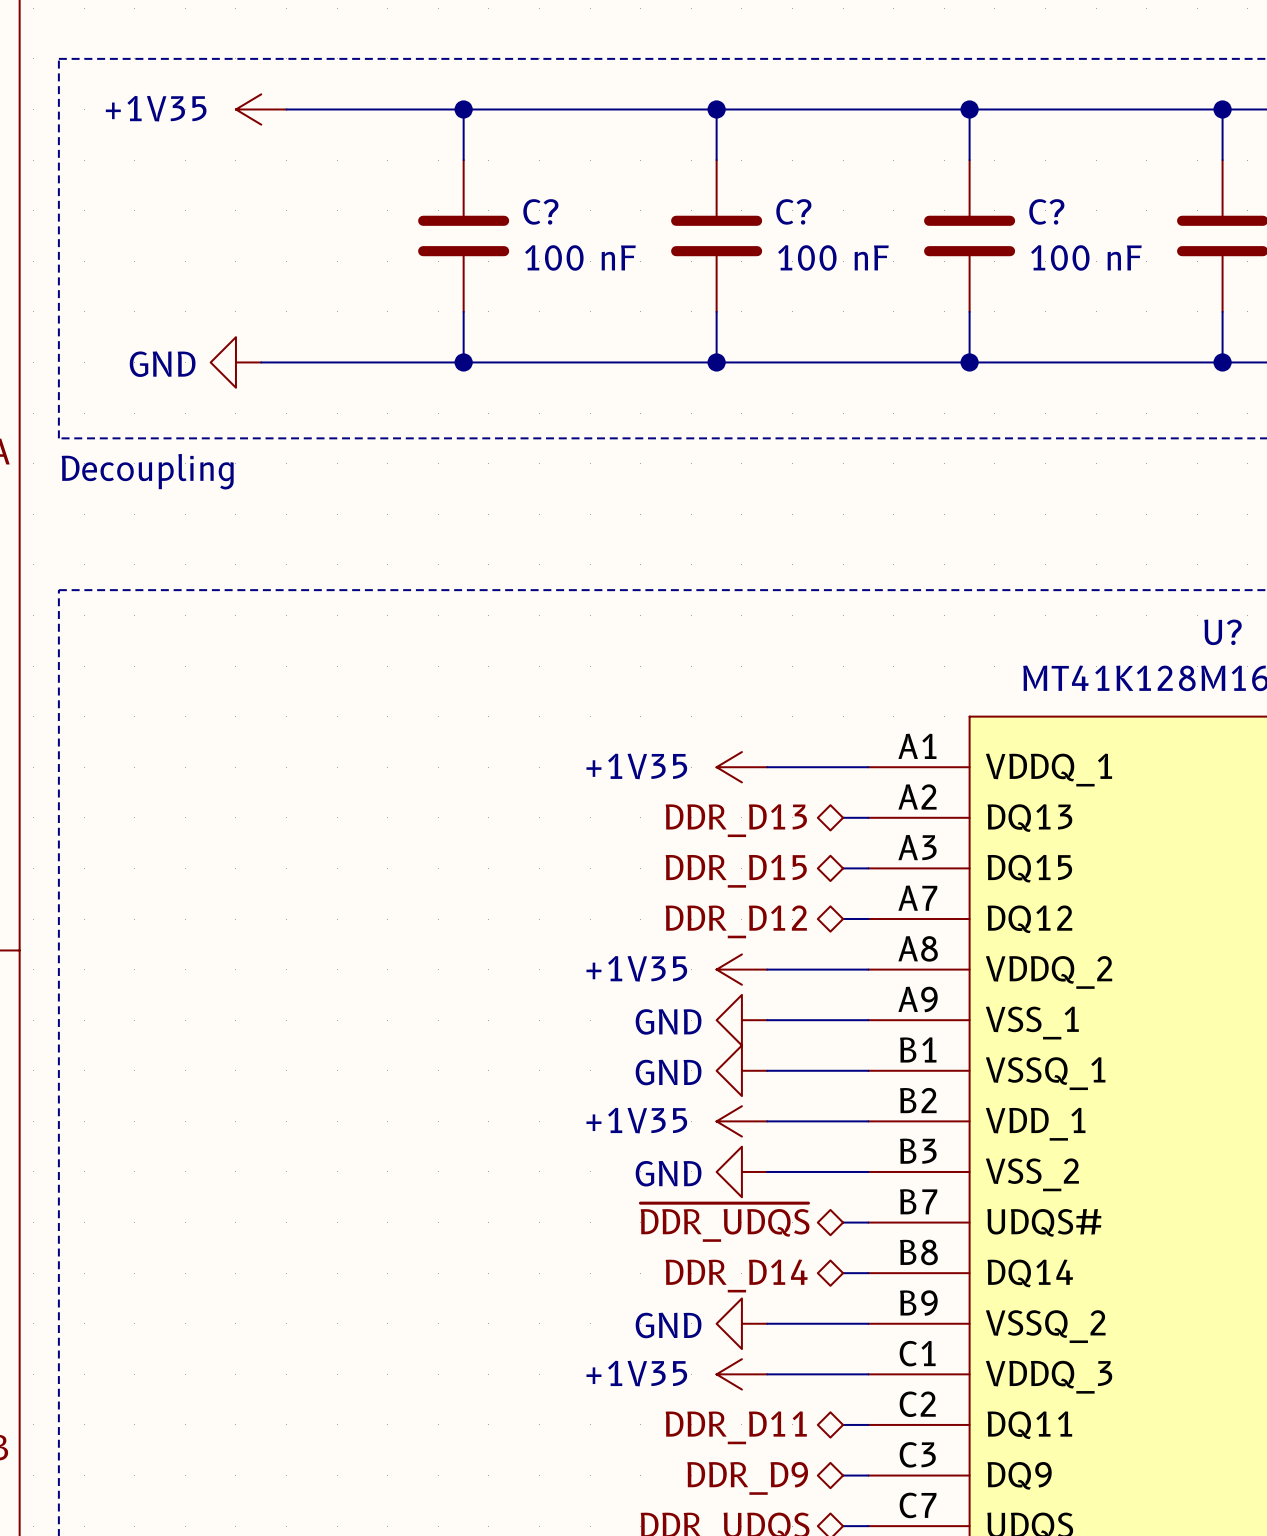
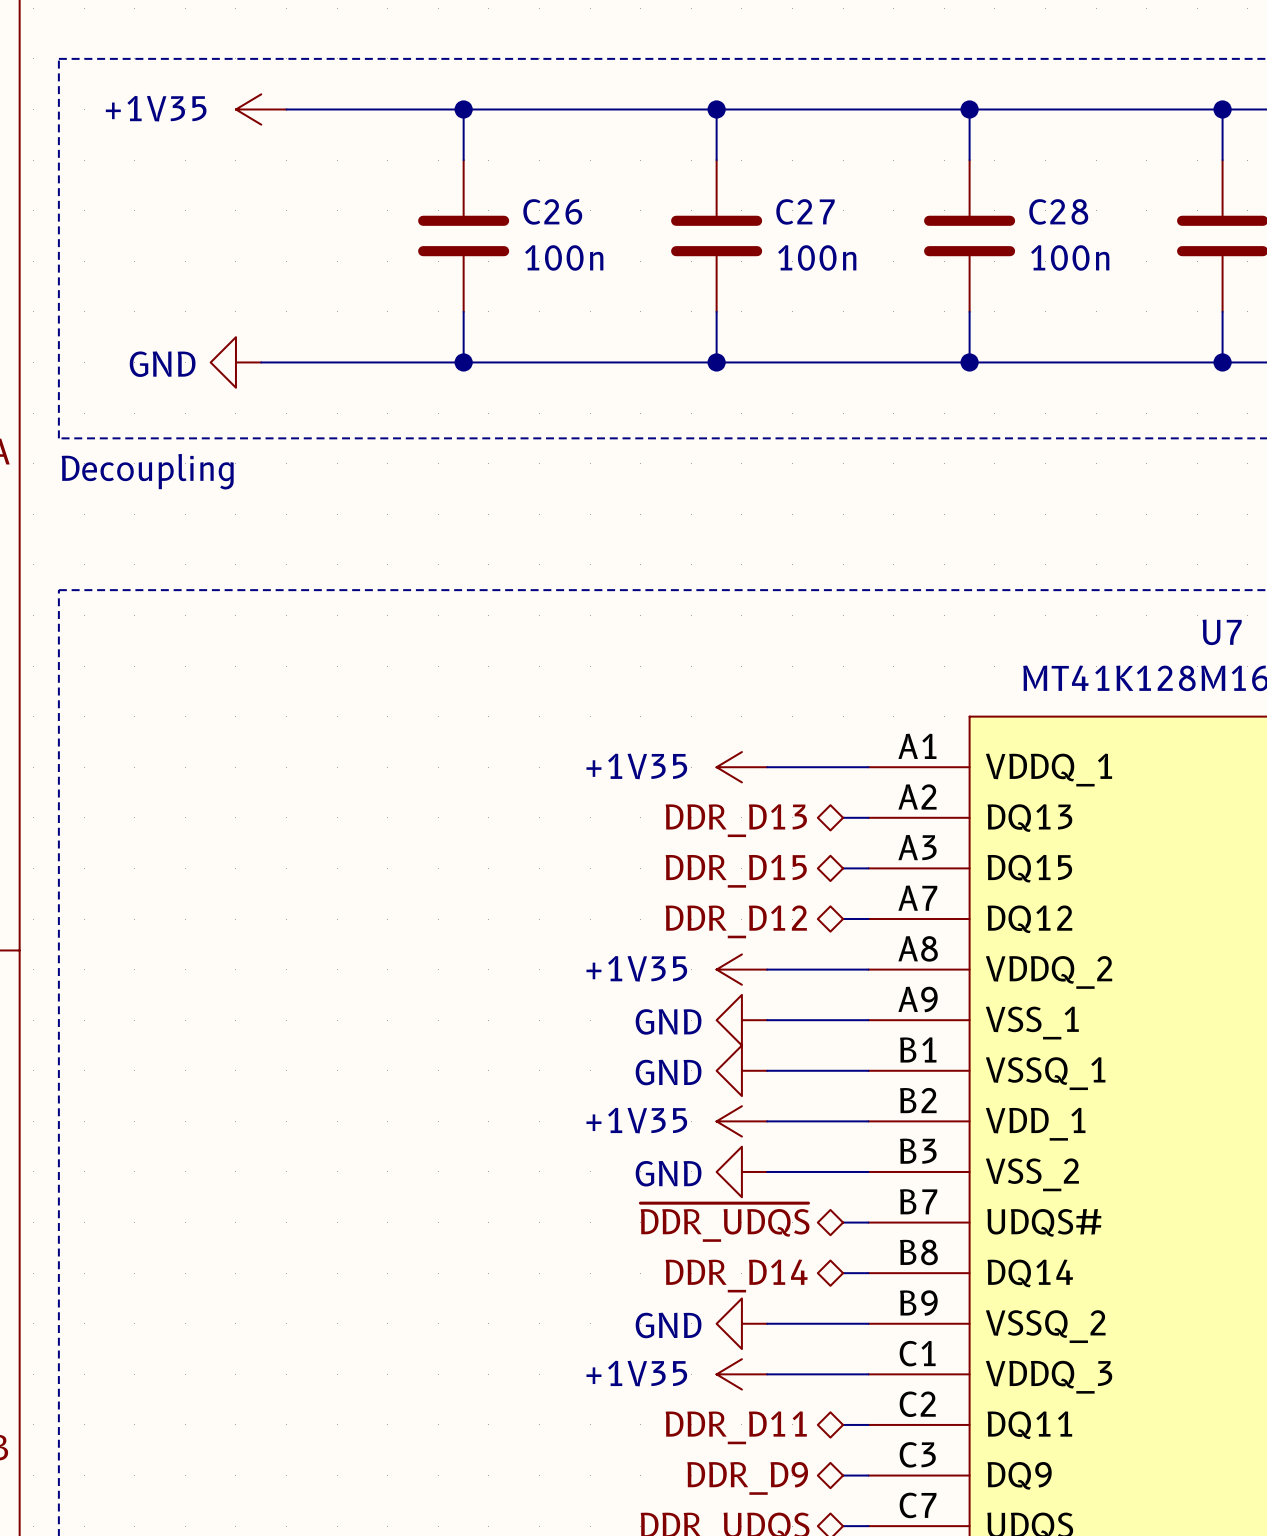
C? name: C? (540, 211) -> C26 (552, 211)
C? name: C? (793, 211) -> C27 (805, 211)
C? name: C? (1046, 211) -> C28 (1058, 211)
C? value: 100 nF (580, 257) -> 100n (564, 257)
C? value: 100 nF (833, 257) -> 100n (817, 257)
C? value: 100 nF (1086, 257) -> 100n (1070, 257)
U? name: U? (1222, 632) -> U7 (1222, 632)

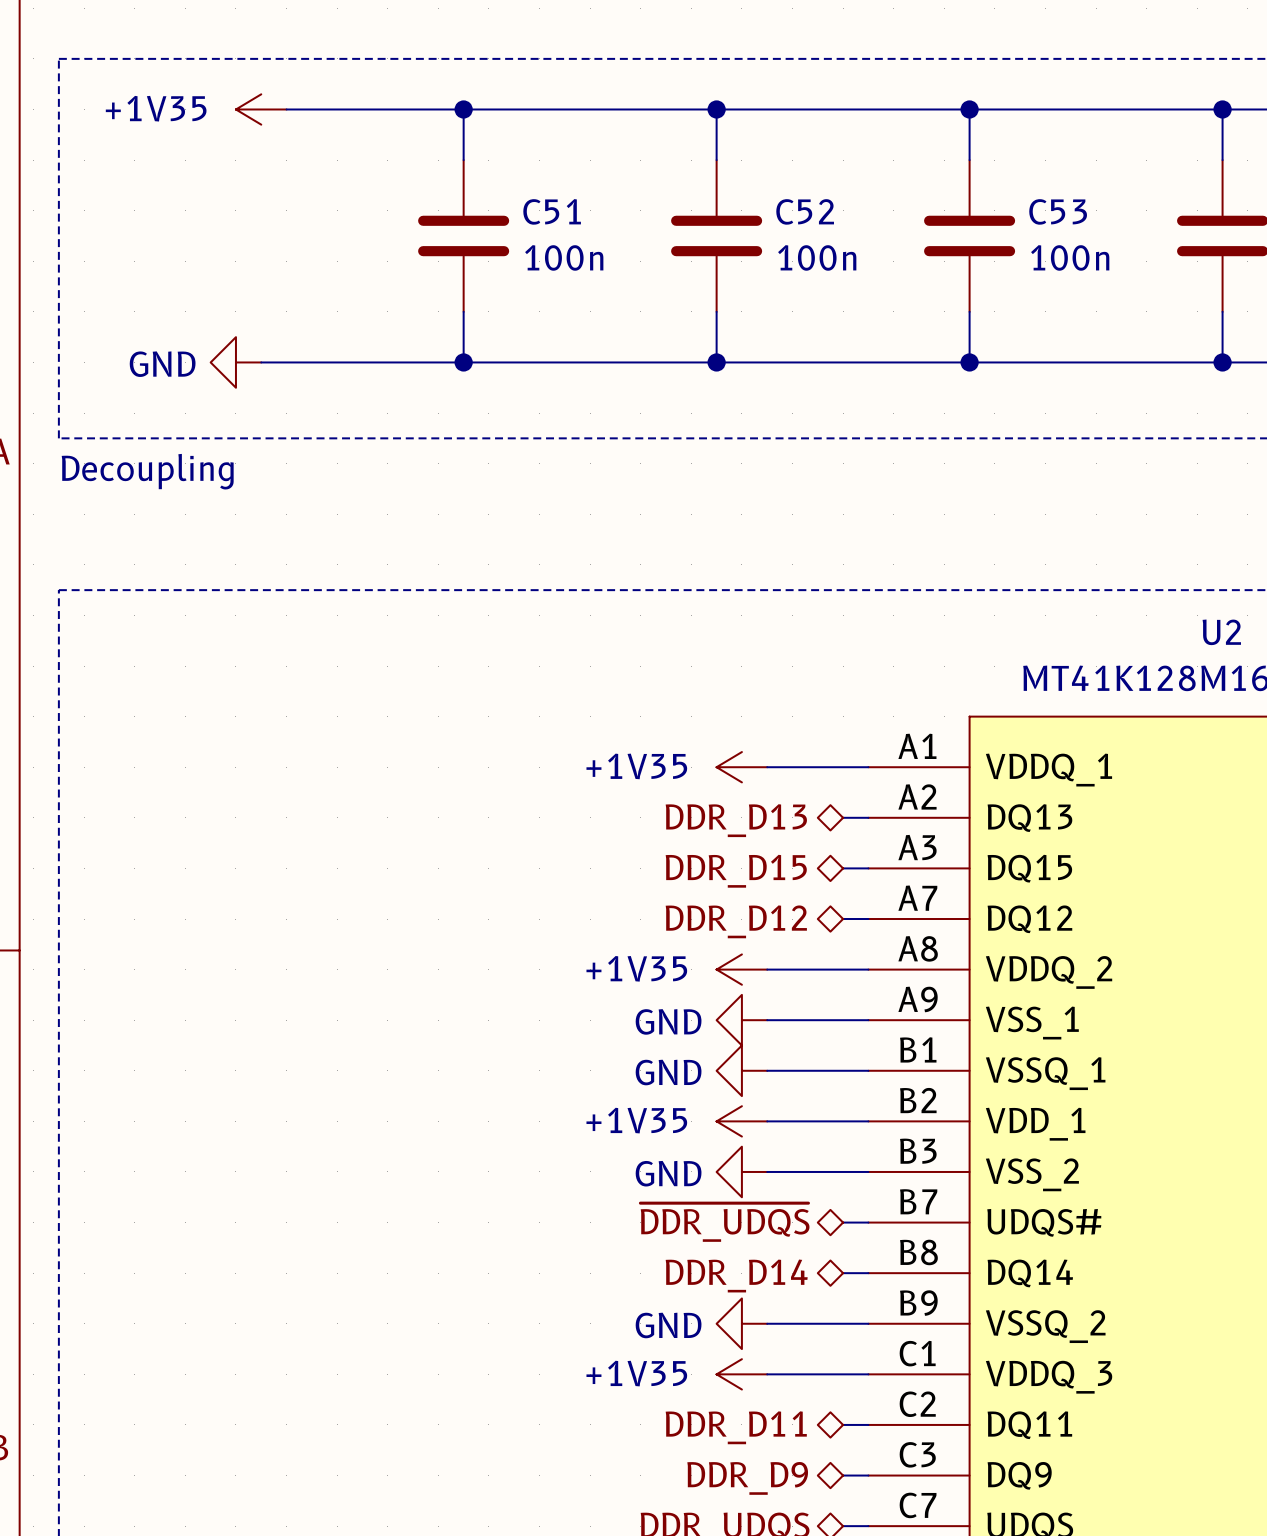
C26 name: C26 (552, 211) -> C51 (552, 211)
C27 name: C27 (805, 211) -> C52 (805, 211)
C28 name: C28 (1058, 211) -> C53 (1058, 211)
U7 name: U7 (1222, 632) -> U2 (1221, 632)

